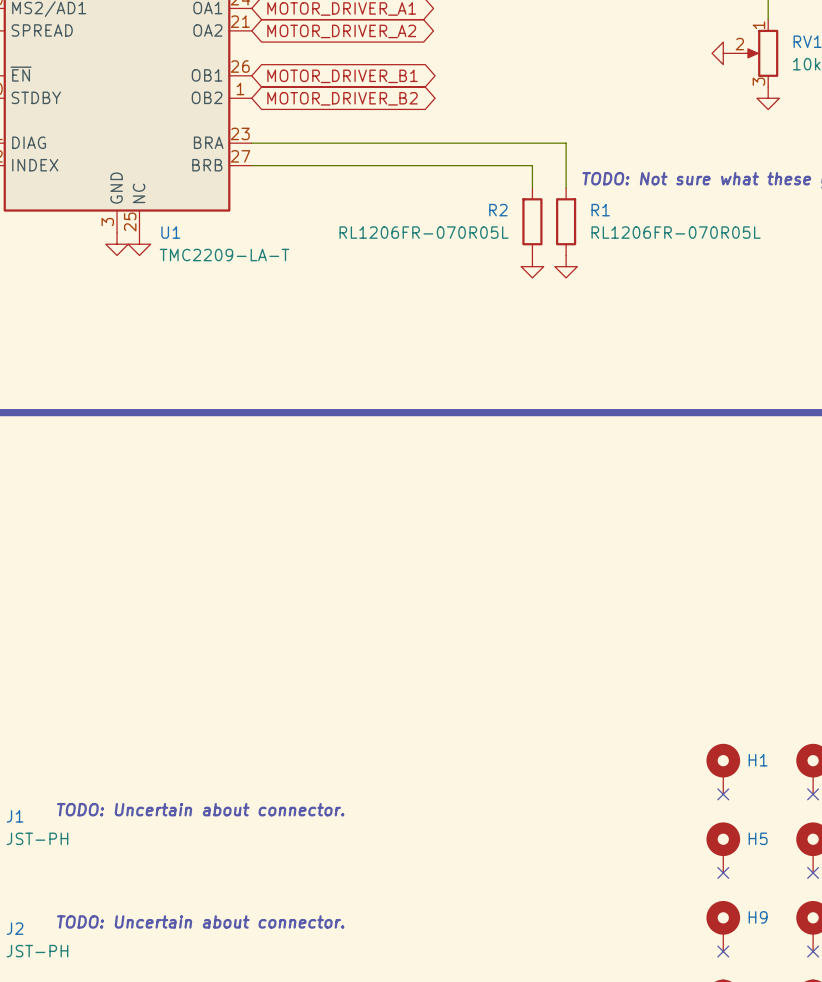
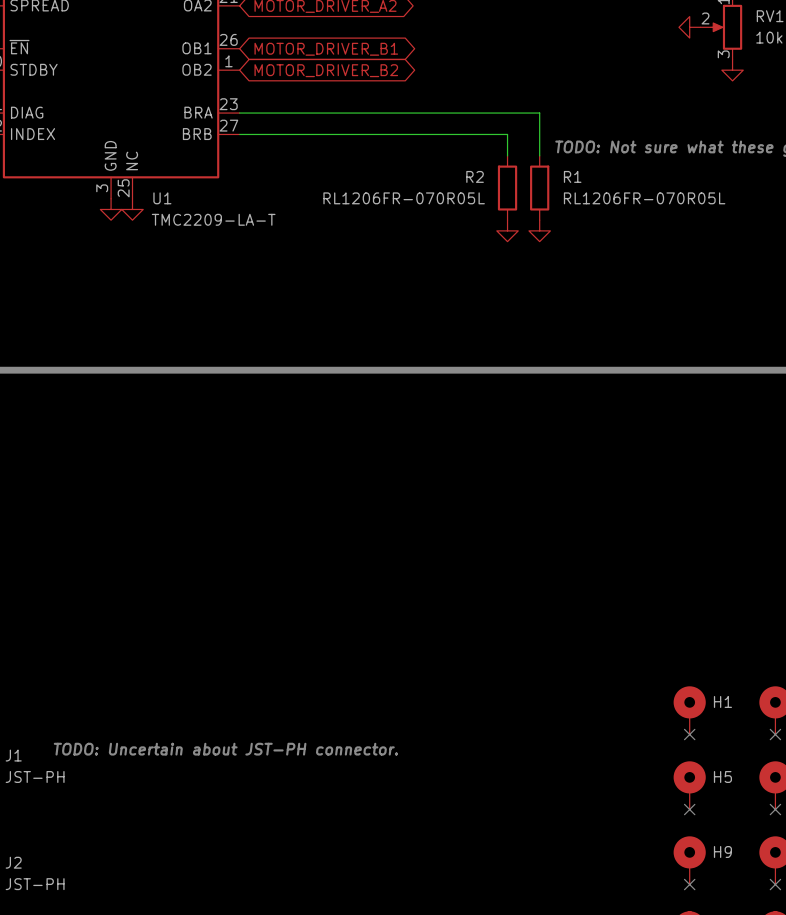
text: TODO: Uncertain about connector. (200, 809) -> TODO: Uncertain about JST-PH connector. (225, 749)
text: TODO: Uncertain about connector. (200, 921) -> none

